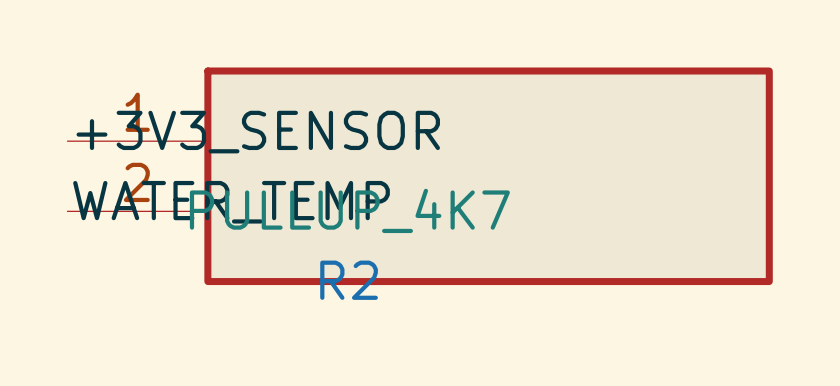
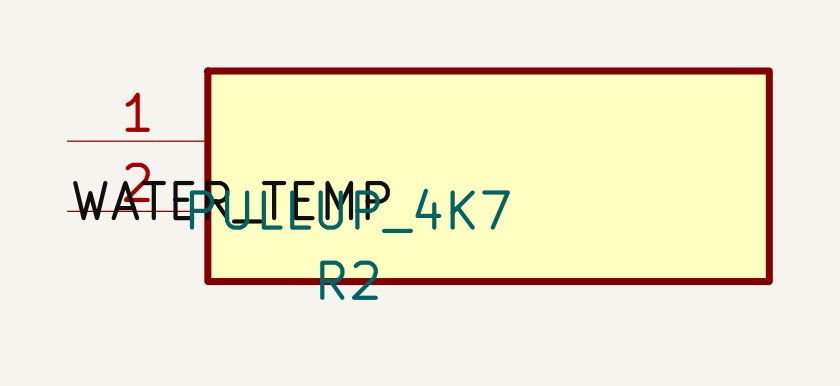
label: +3V3_SENSOR (258, 132) -> none

